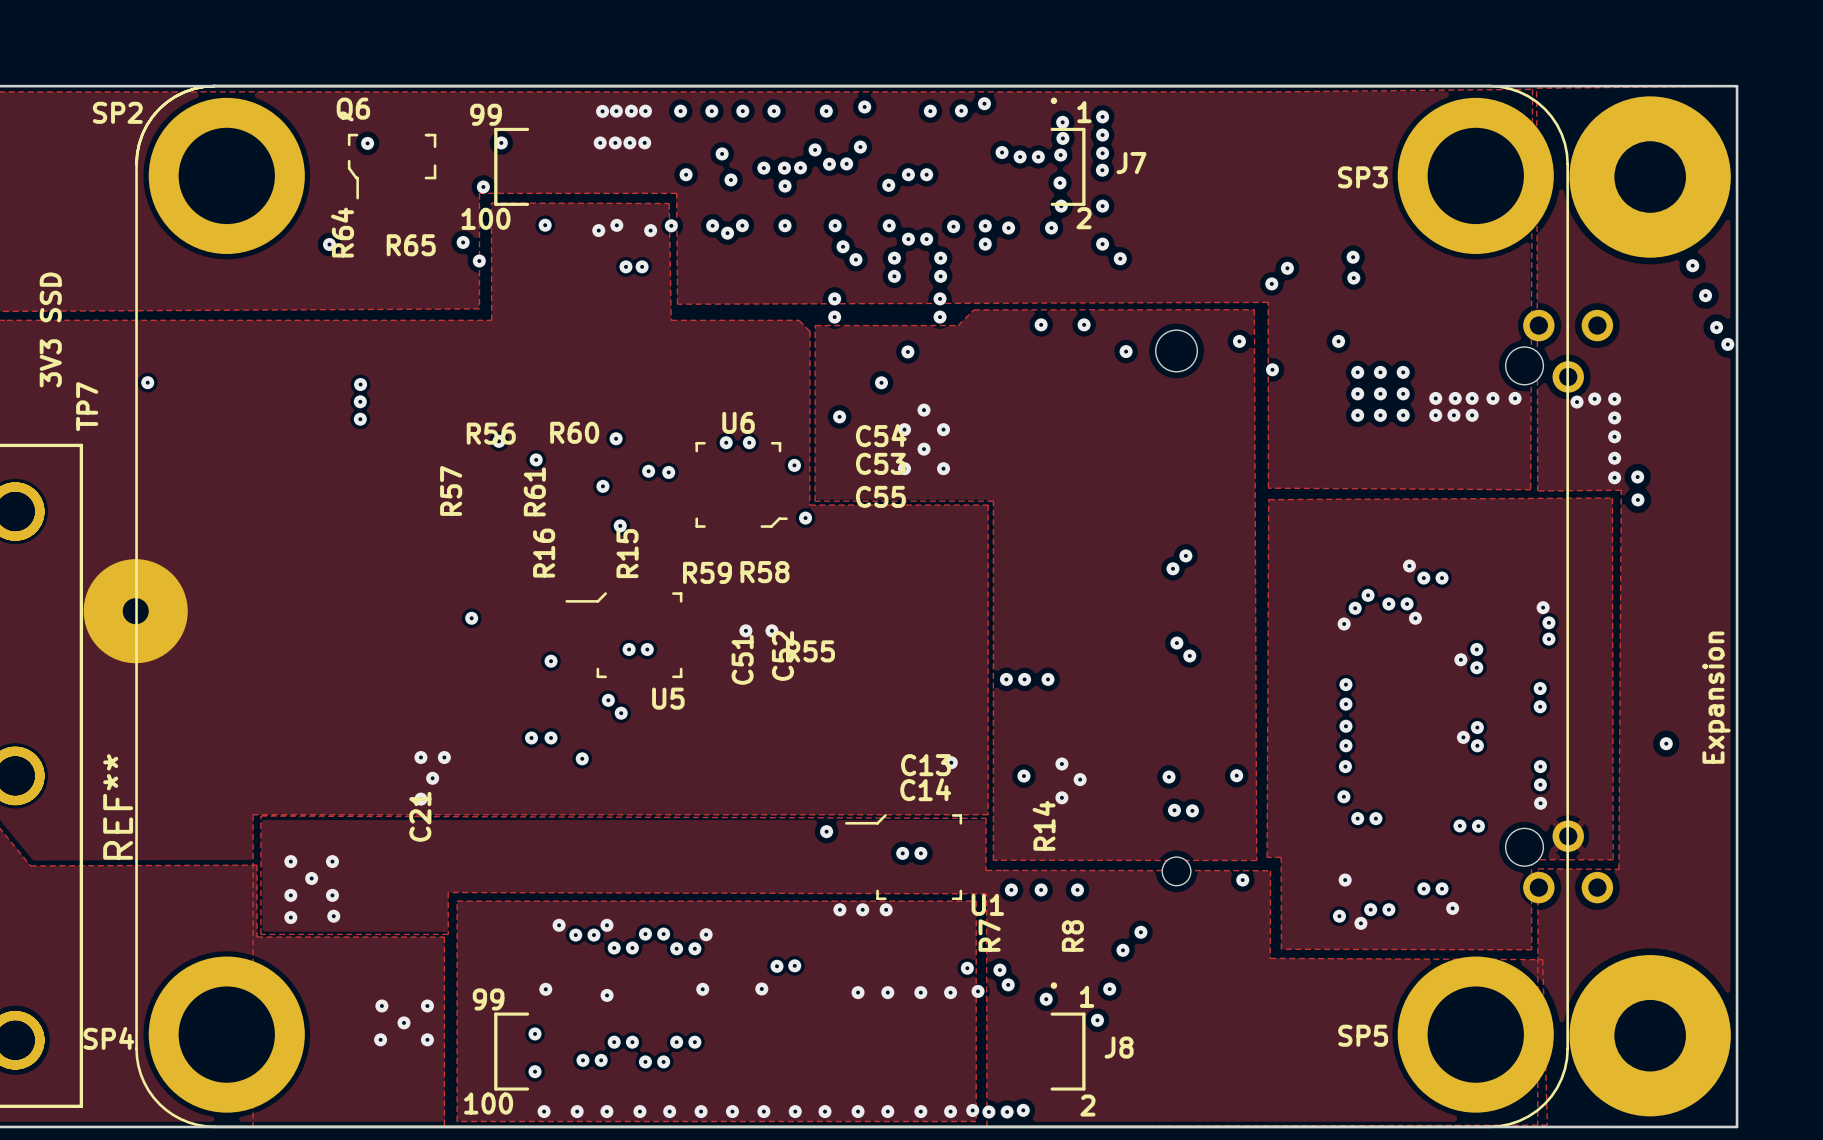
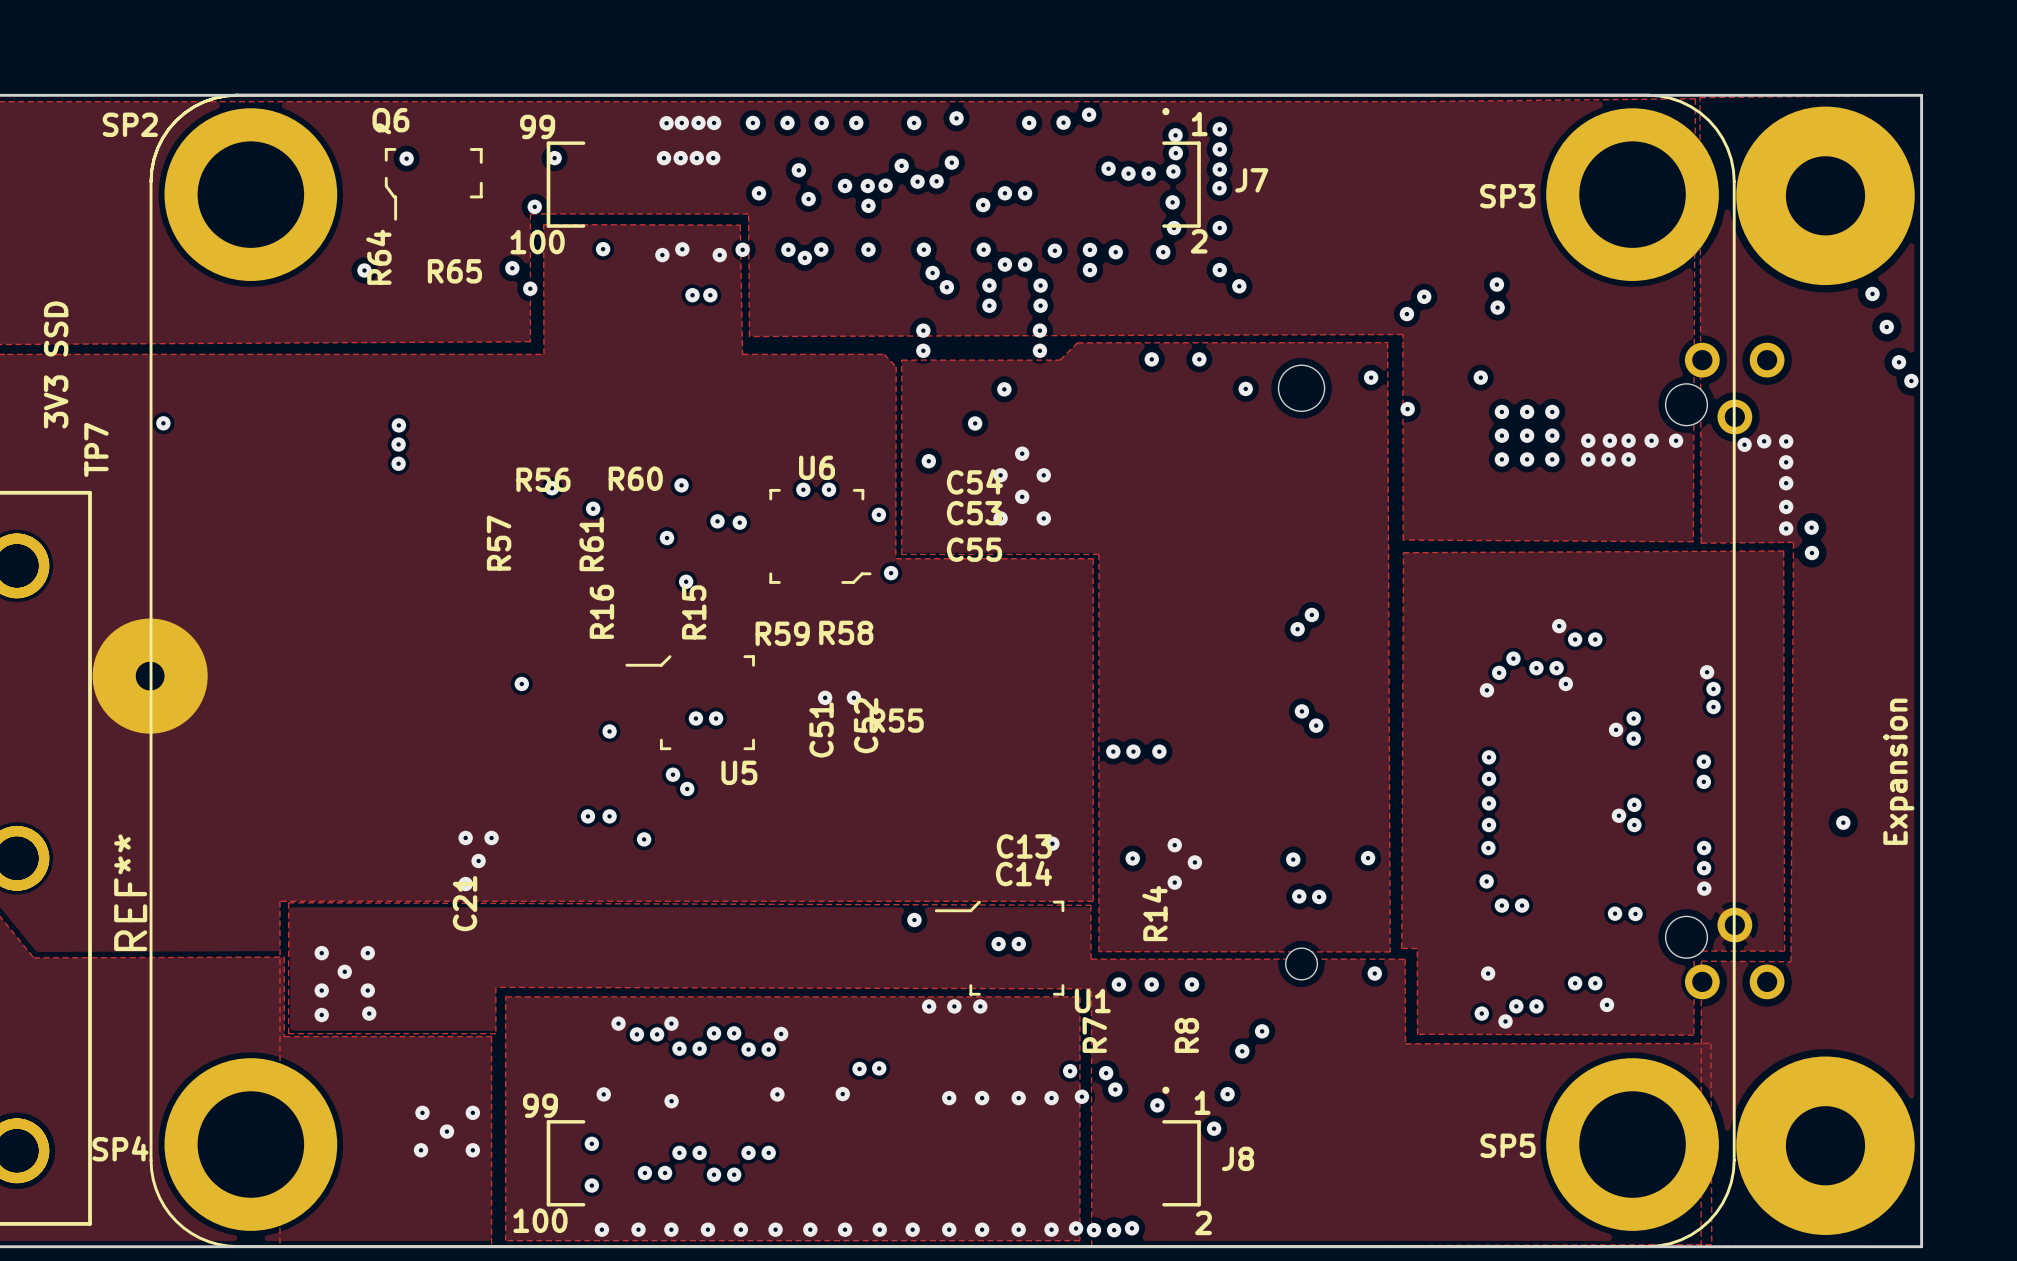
zone outline: (986, 818) (986, 870) (1270, 870) (1270, 958) (1542, 959) (1547, 1125) -> (1090, 905) (1091, 959) (1405, 959) (1405, 1043) (1710, 1043) (1711, 1244)
zone outline: (1281, 857) (1281, 949) (1531, 949) (1531, 859) -> (1417, 948) (1417, 1034) (1693, 1035) (1694, 951)

